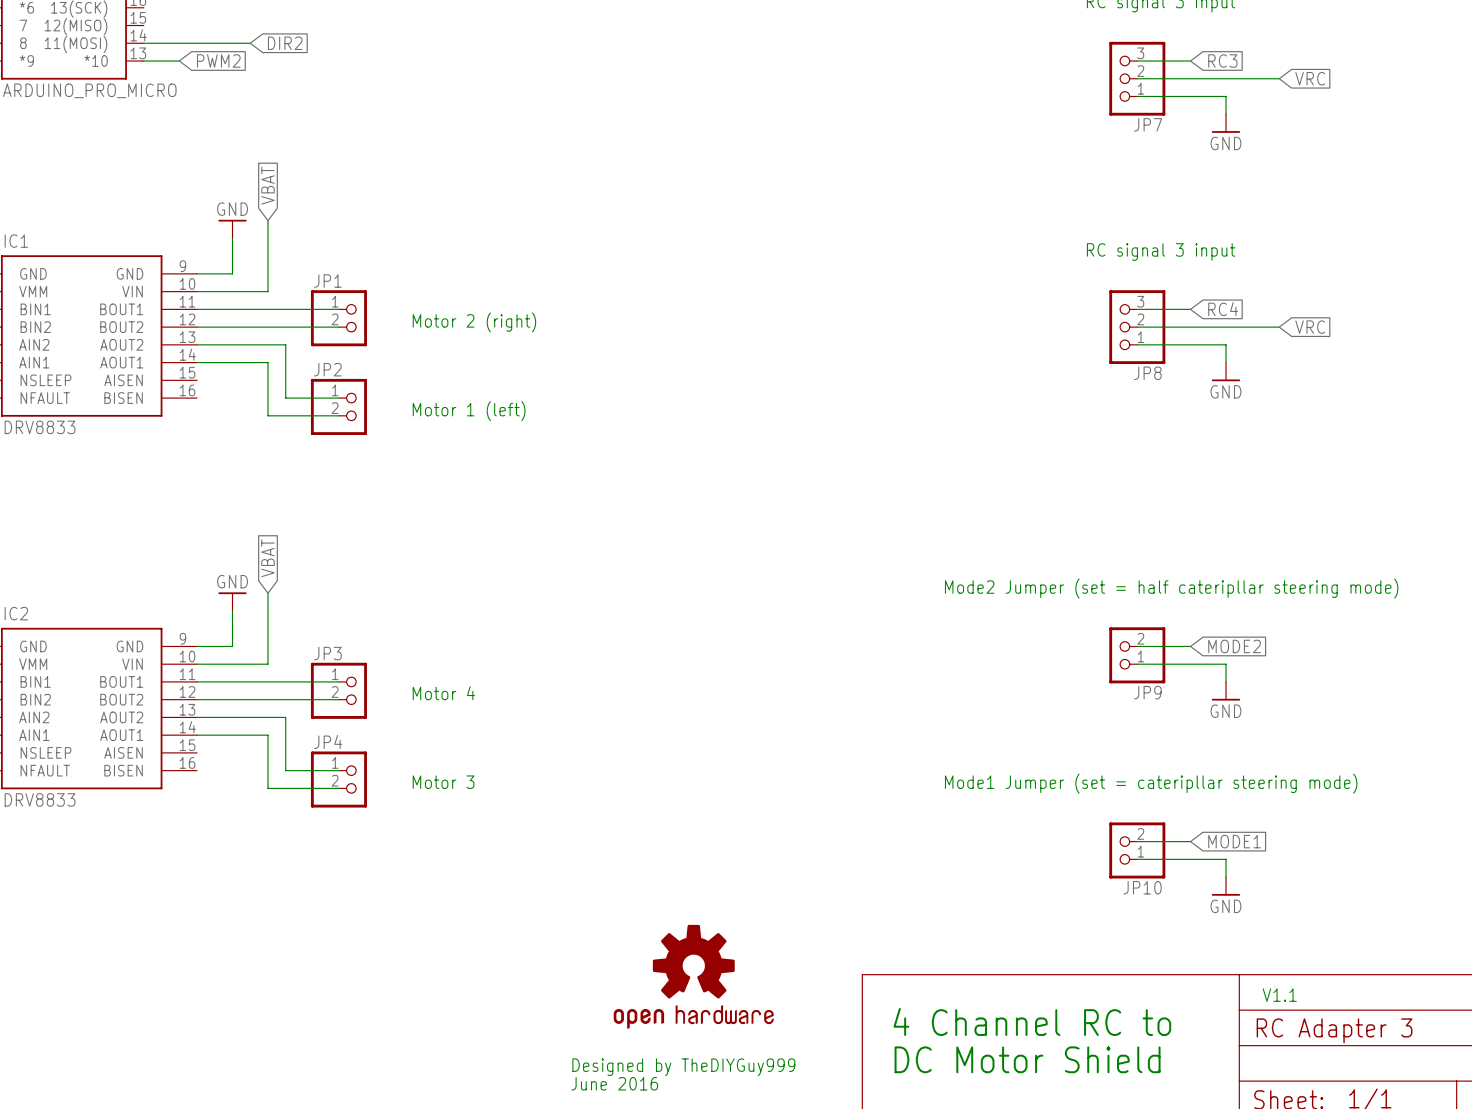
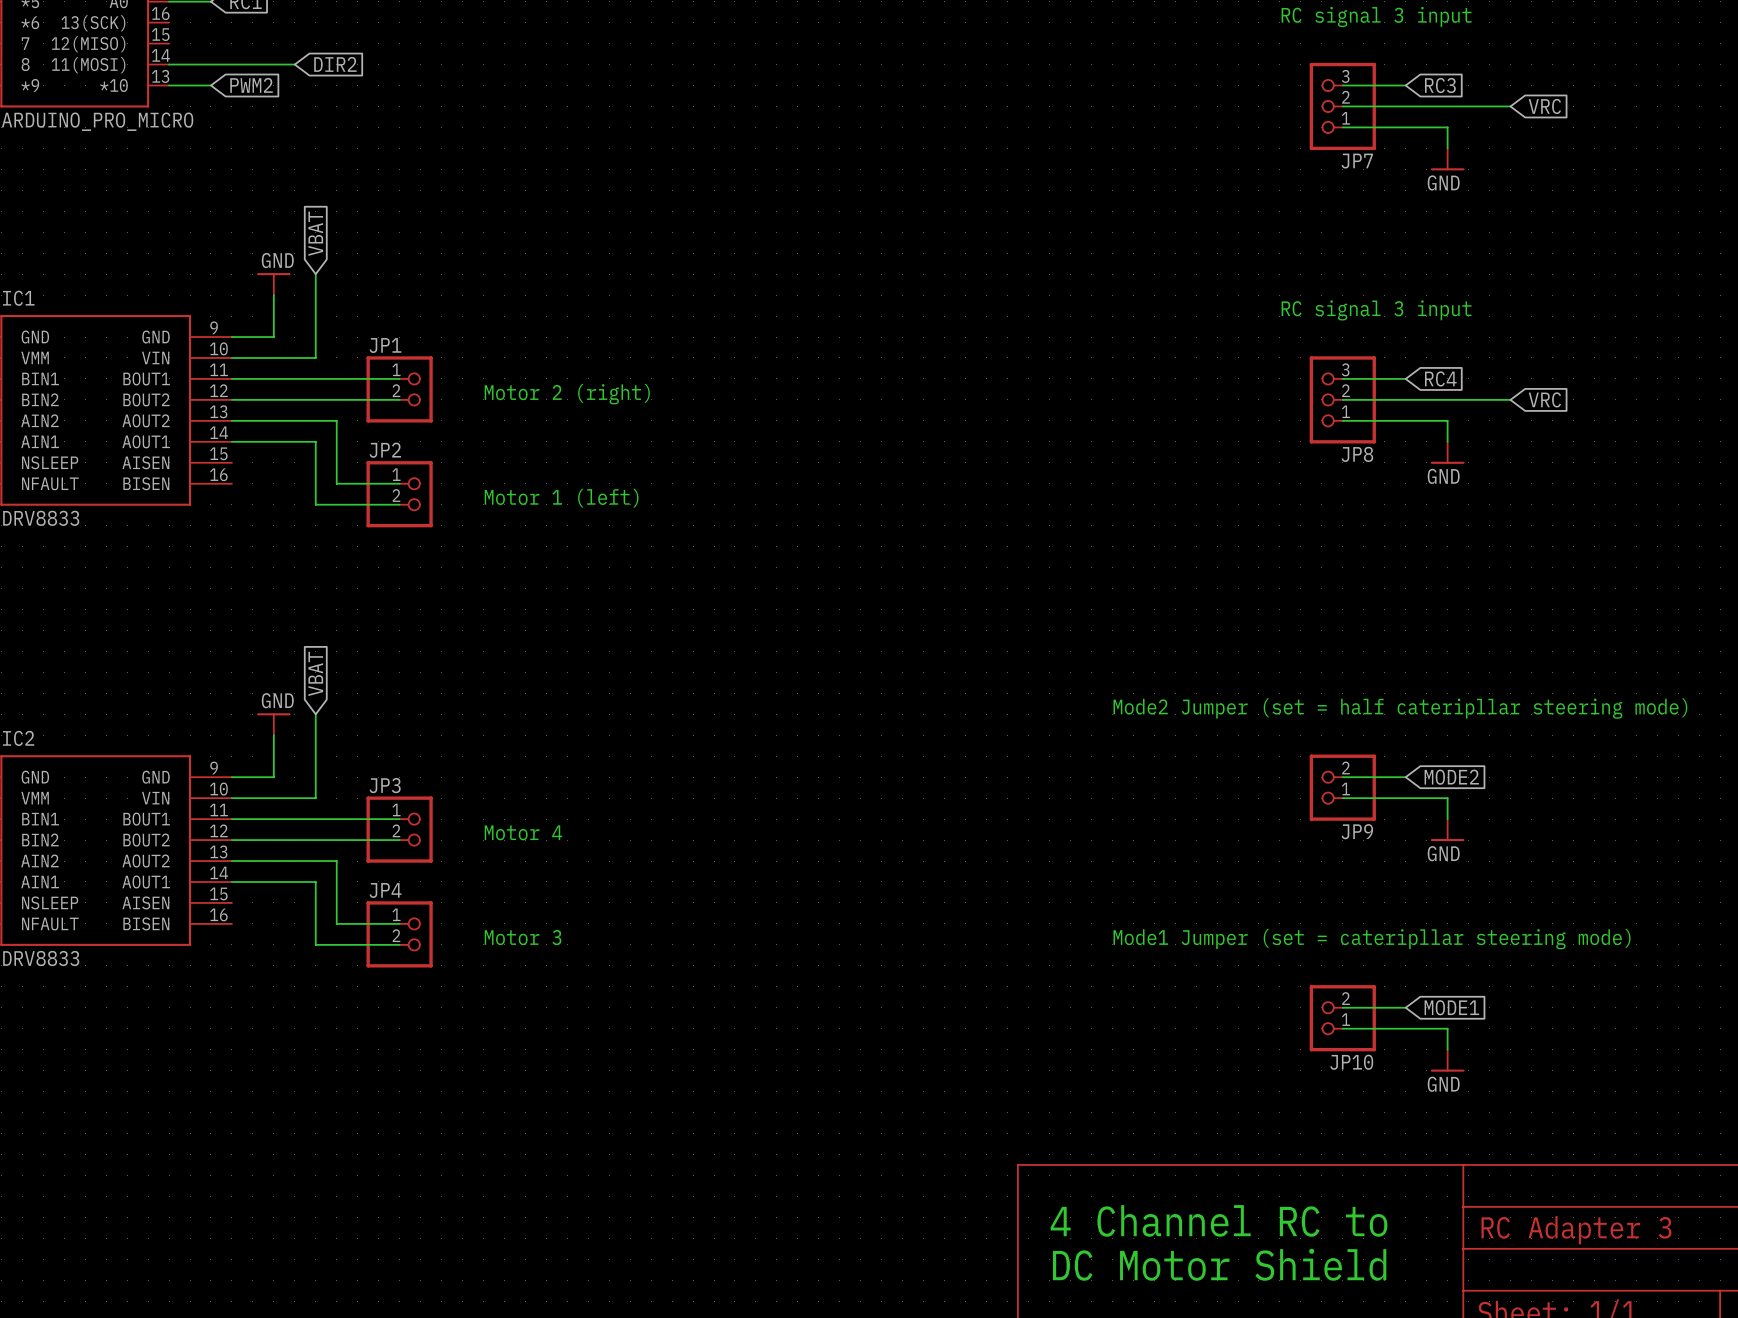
part: (693, 976) -> none
text: V1.1 (1279, 995) -> none
text: Designed by TheDIYGuy999 (683, 1067) -> none
text: June 2016 (614, 1083) -> none

